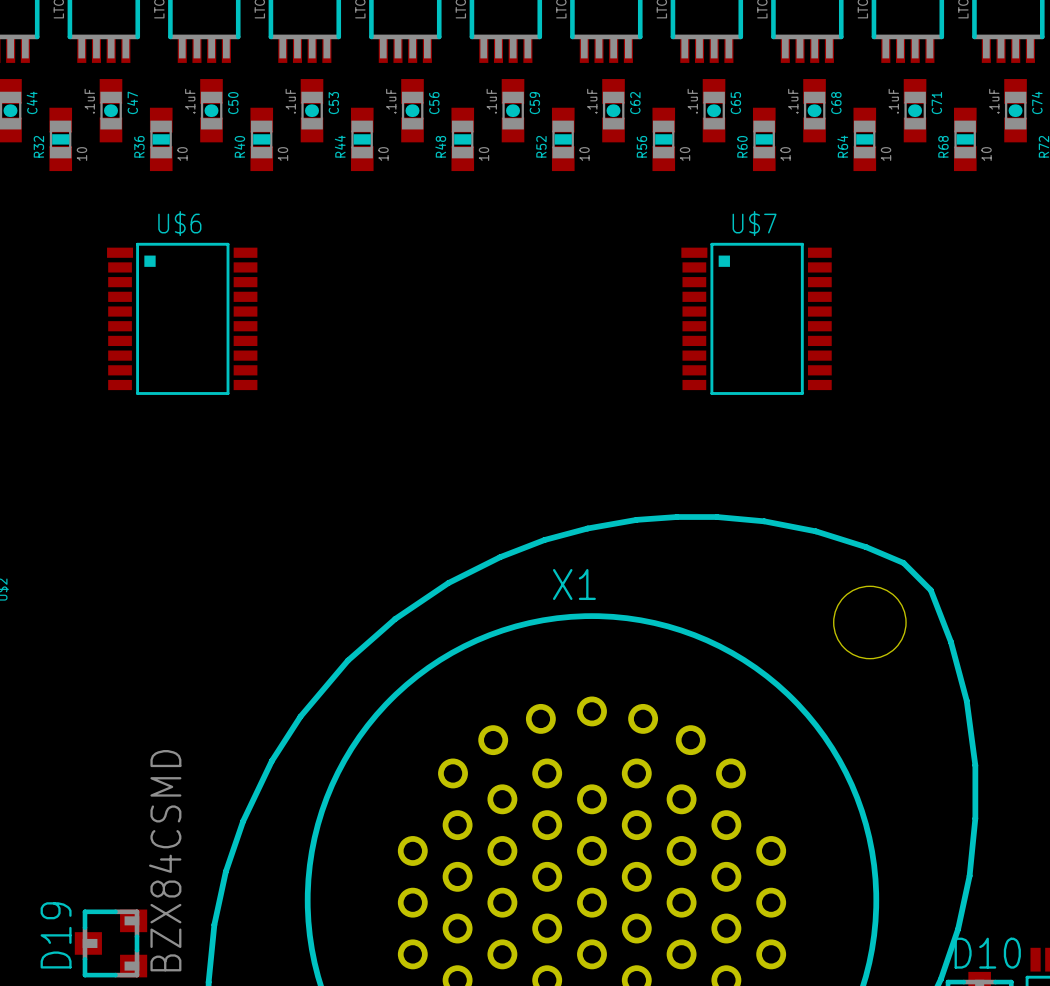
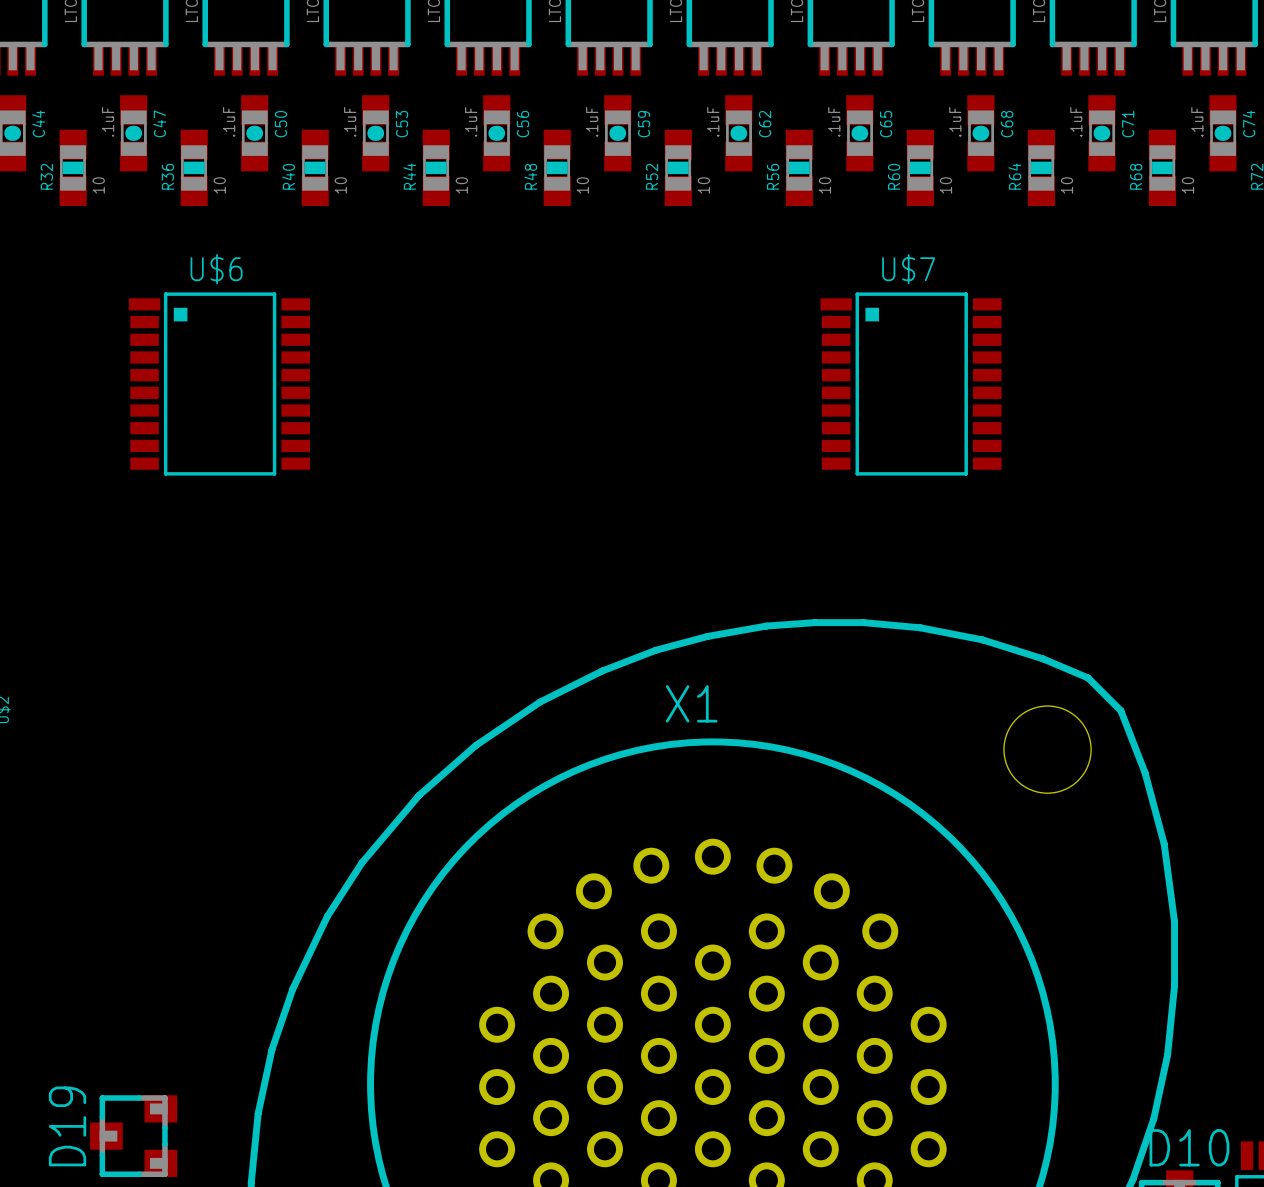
D19 value: BZX84CSMD (165, 860) -> none

